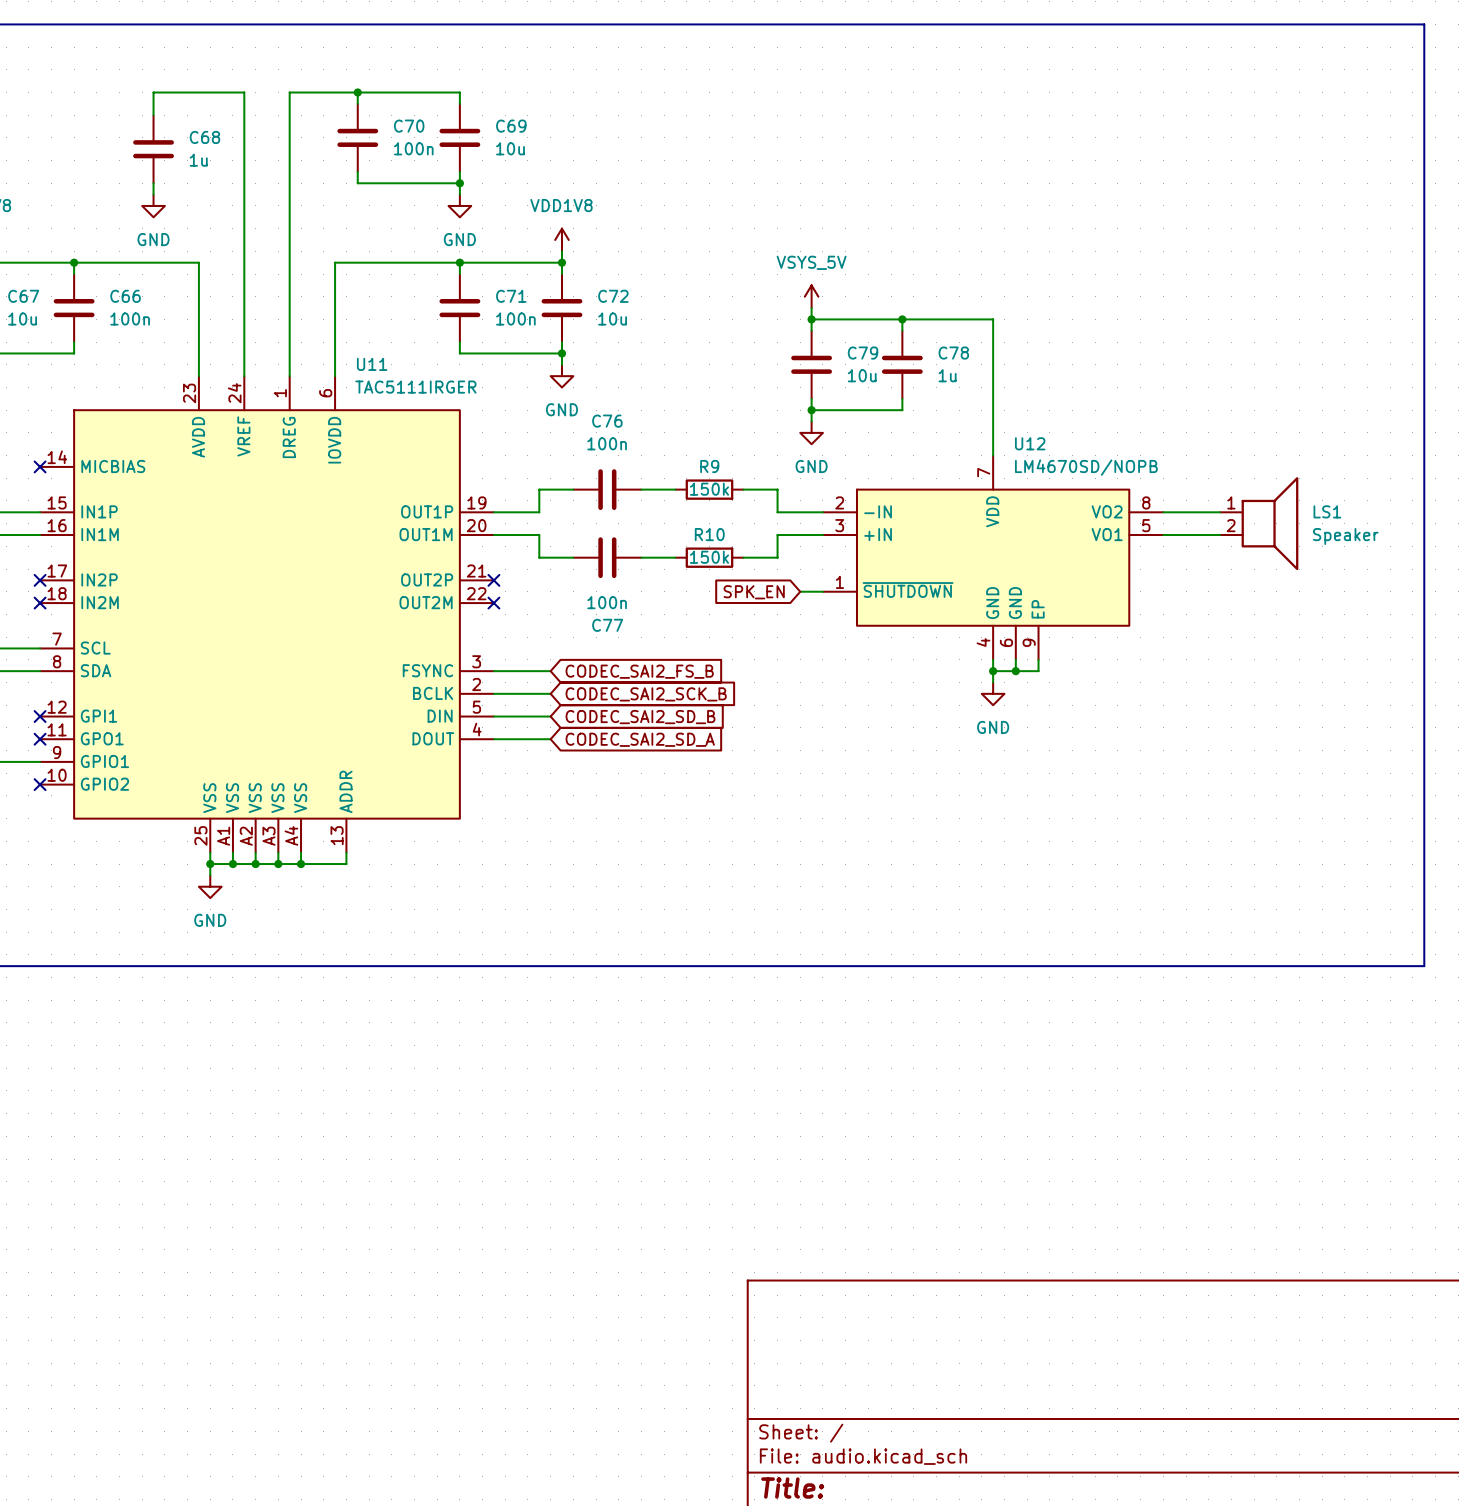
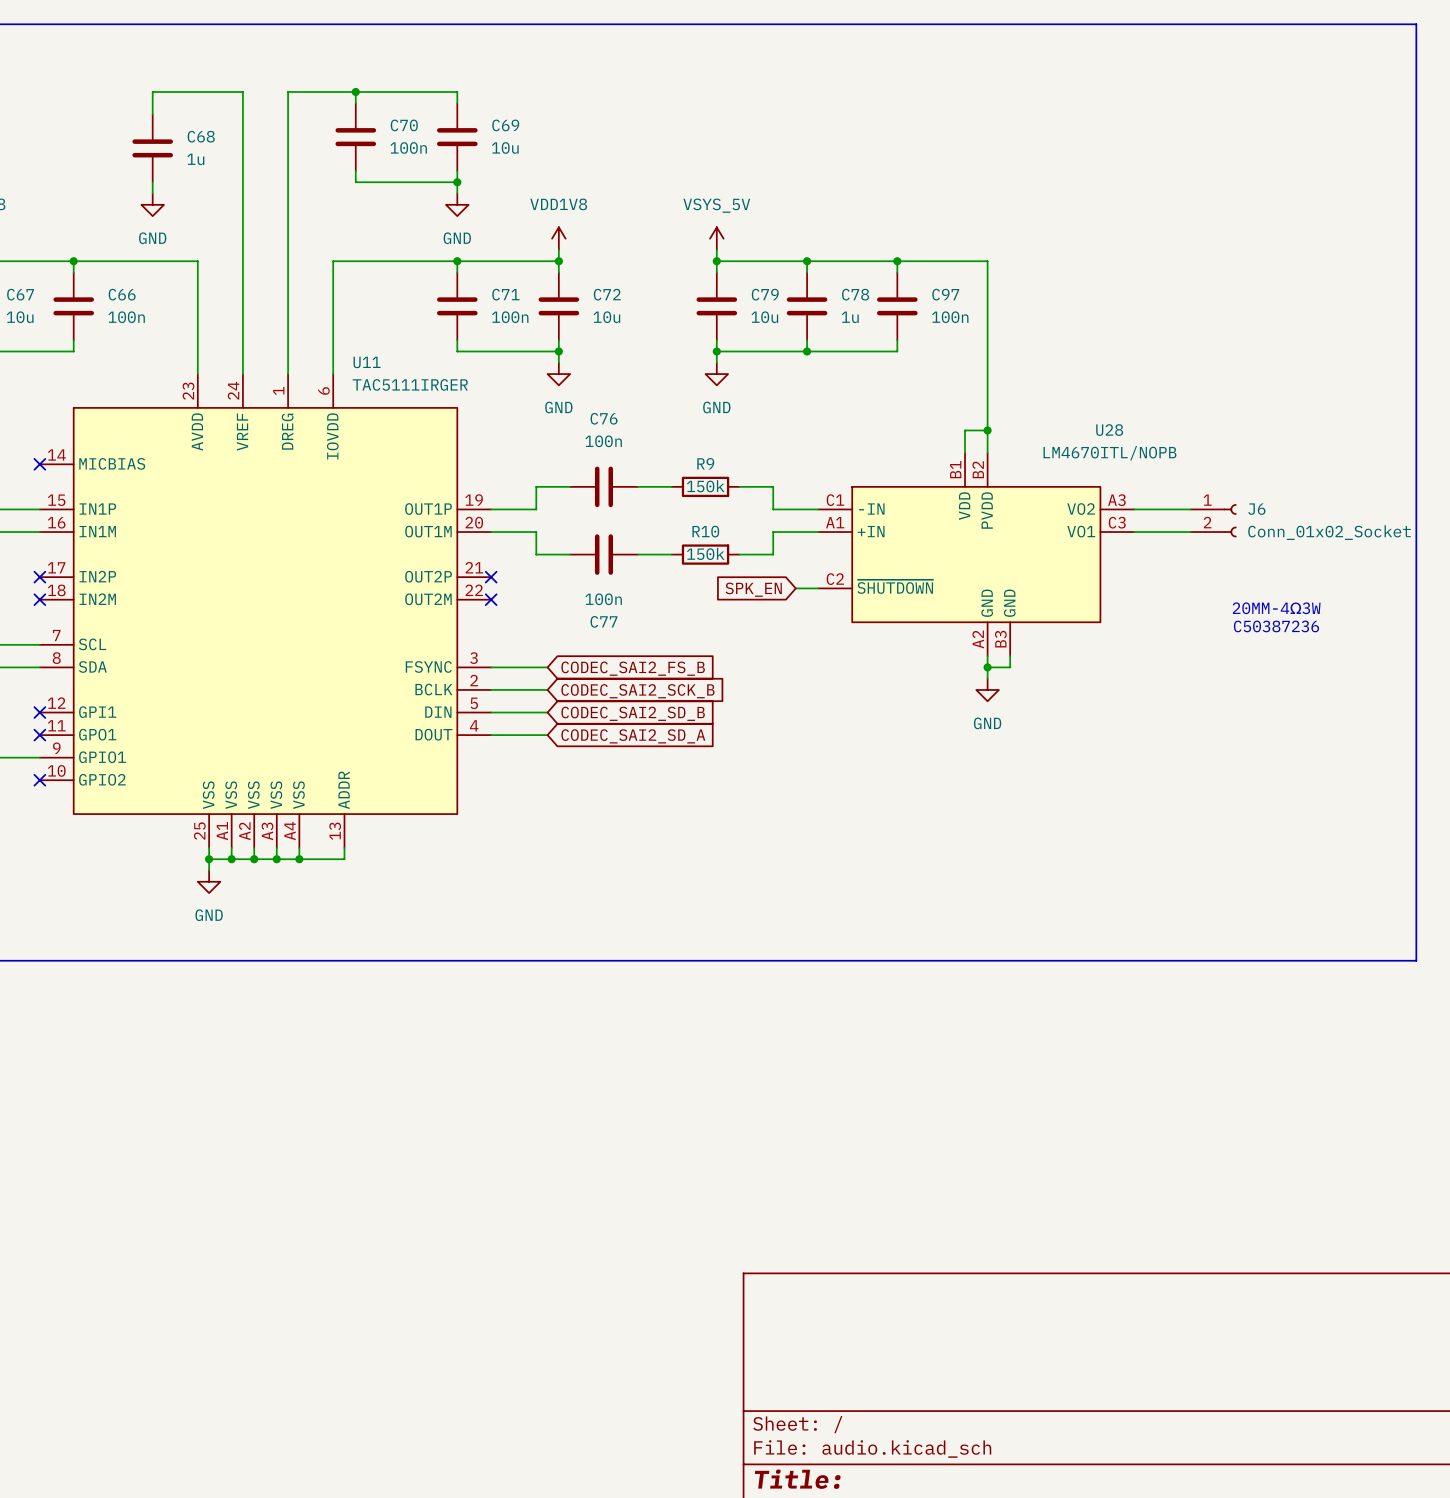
junction: none -> (716, 261)
junction: none -> (807, 261)
wire: none -> (897, 261) (897, 272)
junction: none -> (897, 261)
power symbol position: VSYS_5V (811, 296) -> VSYS_5V (716, 238)
C97: none -> 100n (897, 306)
wire: (811, 319) (993, 319) -> (716, 261) (987, 261) (987, 317)
junction: (811, 319) -> none
junction: (902, 319) -> none
wire: none -> (897, 340) (897, 351) (716, 351)
junction: none -> (716, 351)
junction: none -> (807, 351)
C79 position: (811, 364) -> (716, 306)
C78 position: (902, 364) -> (807, 306)
wire: (811, 398) (811, 421) -> (716, 340) (716, 362)
wire: (902, 398) (902, 410) (811, 410) -> none
junction: (811, 410) -> none
power symbol position: GND (811, 432) -> GND (716, 374)
wire: none -> (987, 430) (965, 430) (965, 453)
junction: none -> (987, 430)
J6: none -> Conn_01x02_Socket (1213, 520)
LS1: Speaker (1259, 523) -> none
U28: none -> LM4670ITL/NOPB (976, 554)
U12: LM4670SD/NOPB (993, 557) -> none
text: none -> 20MM-4Ω3W (1276, 608)
text: none -> C50387236 (1276, 626)
wire: (1038, 659) (1038, 671) (1015, 671) -> none
junction: (1015, 671) -> none

